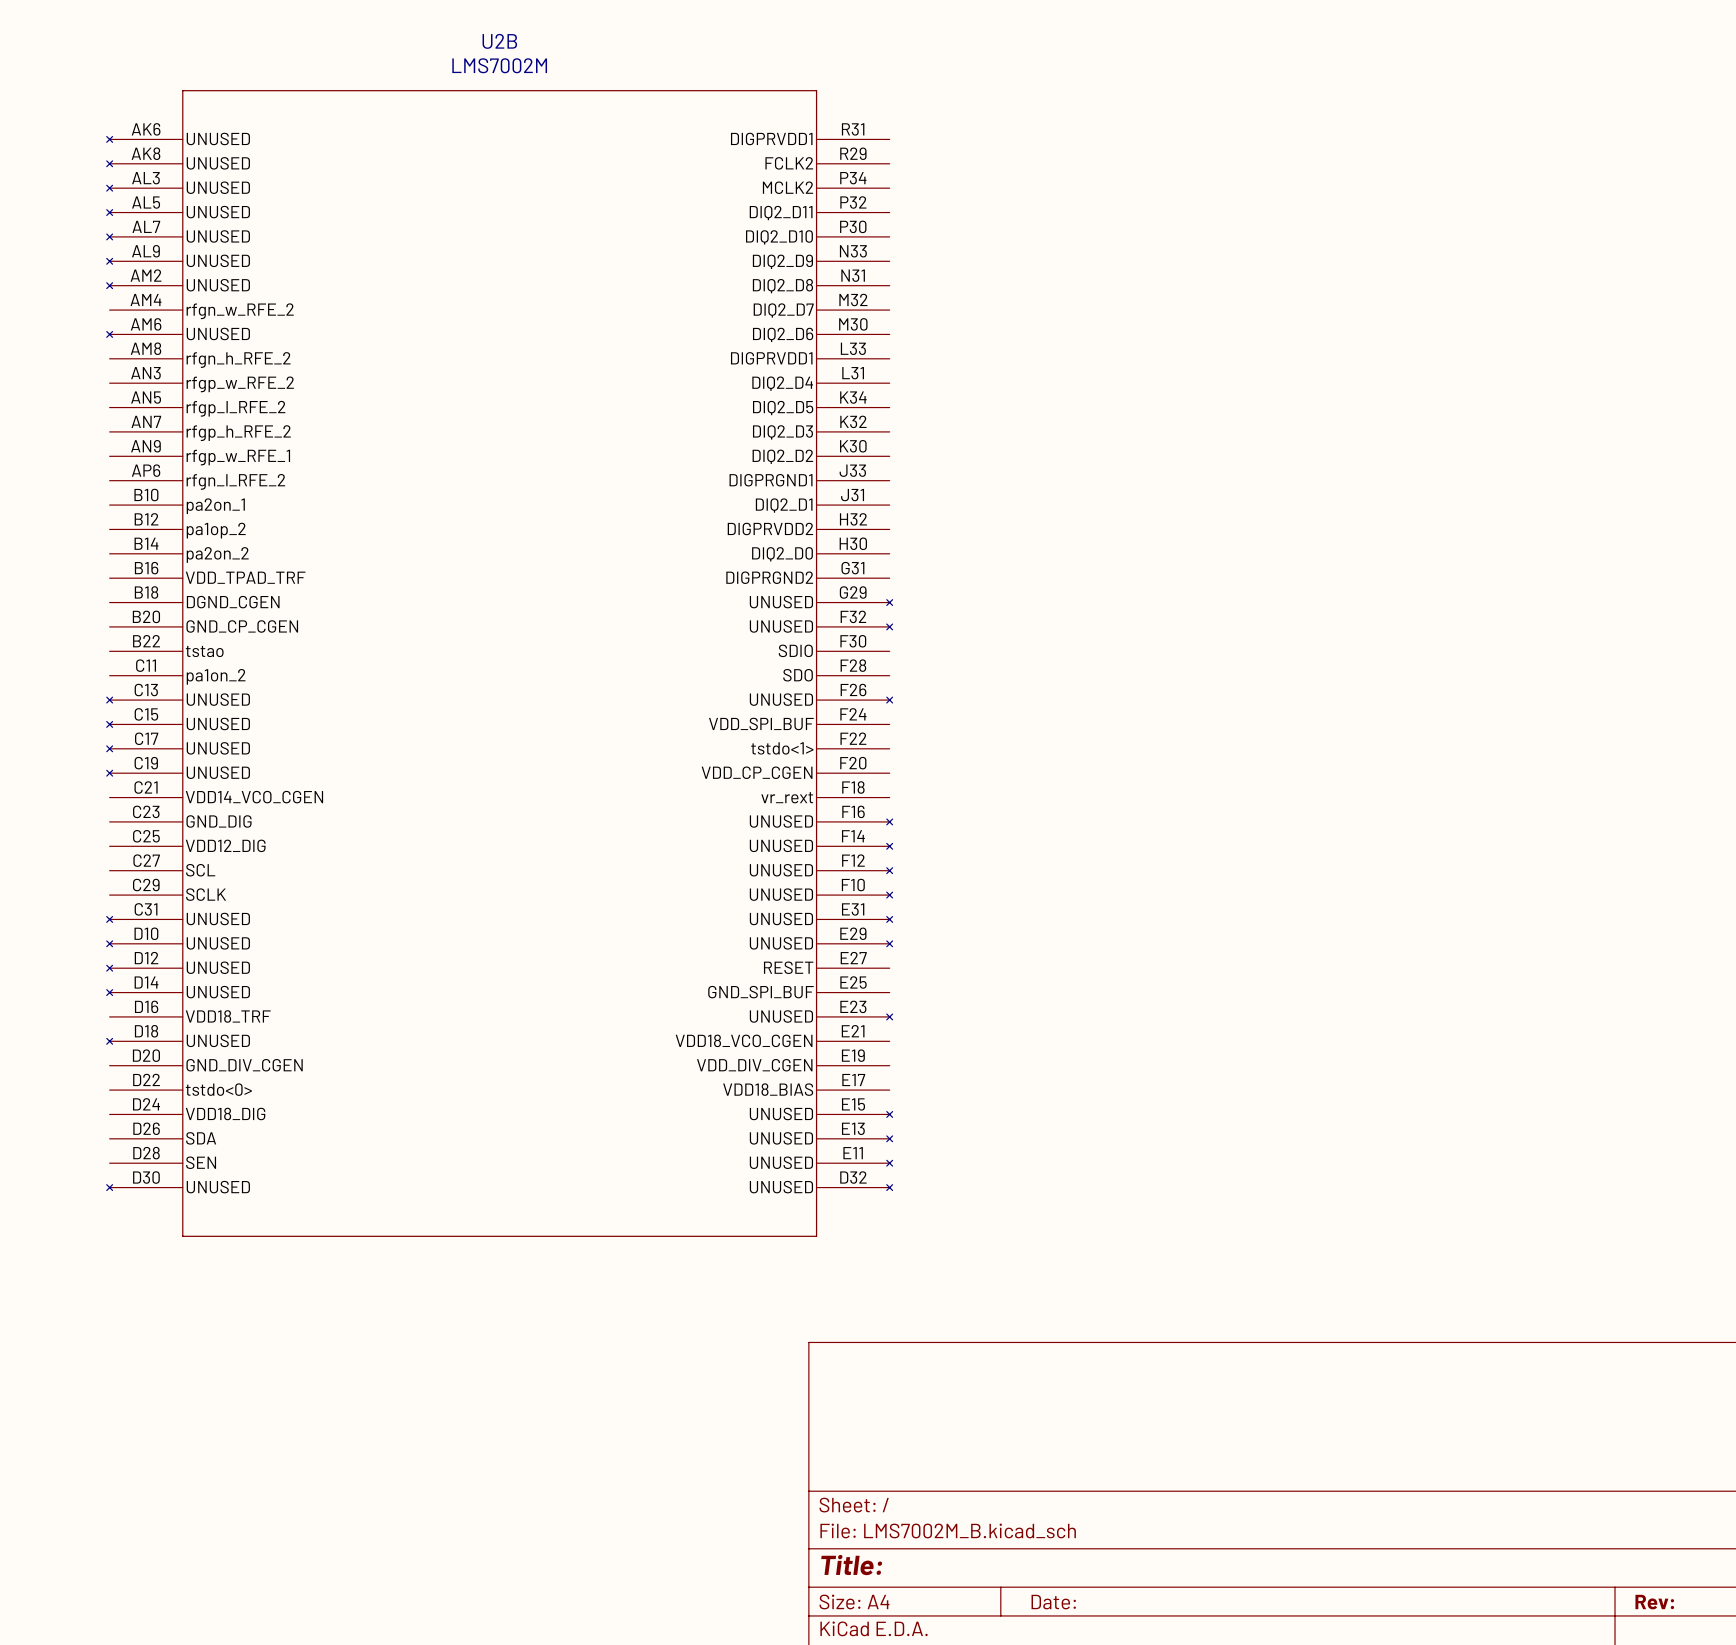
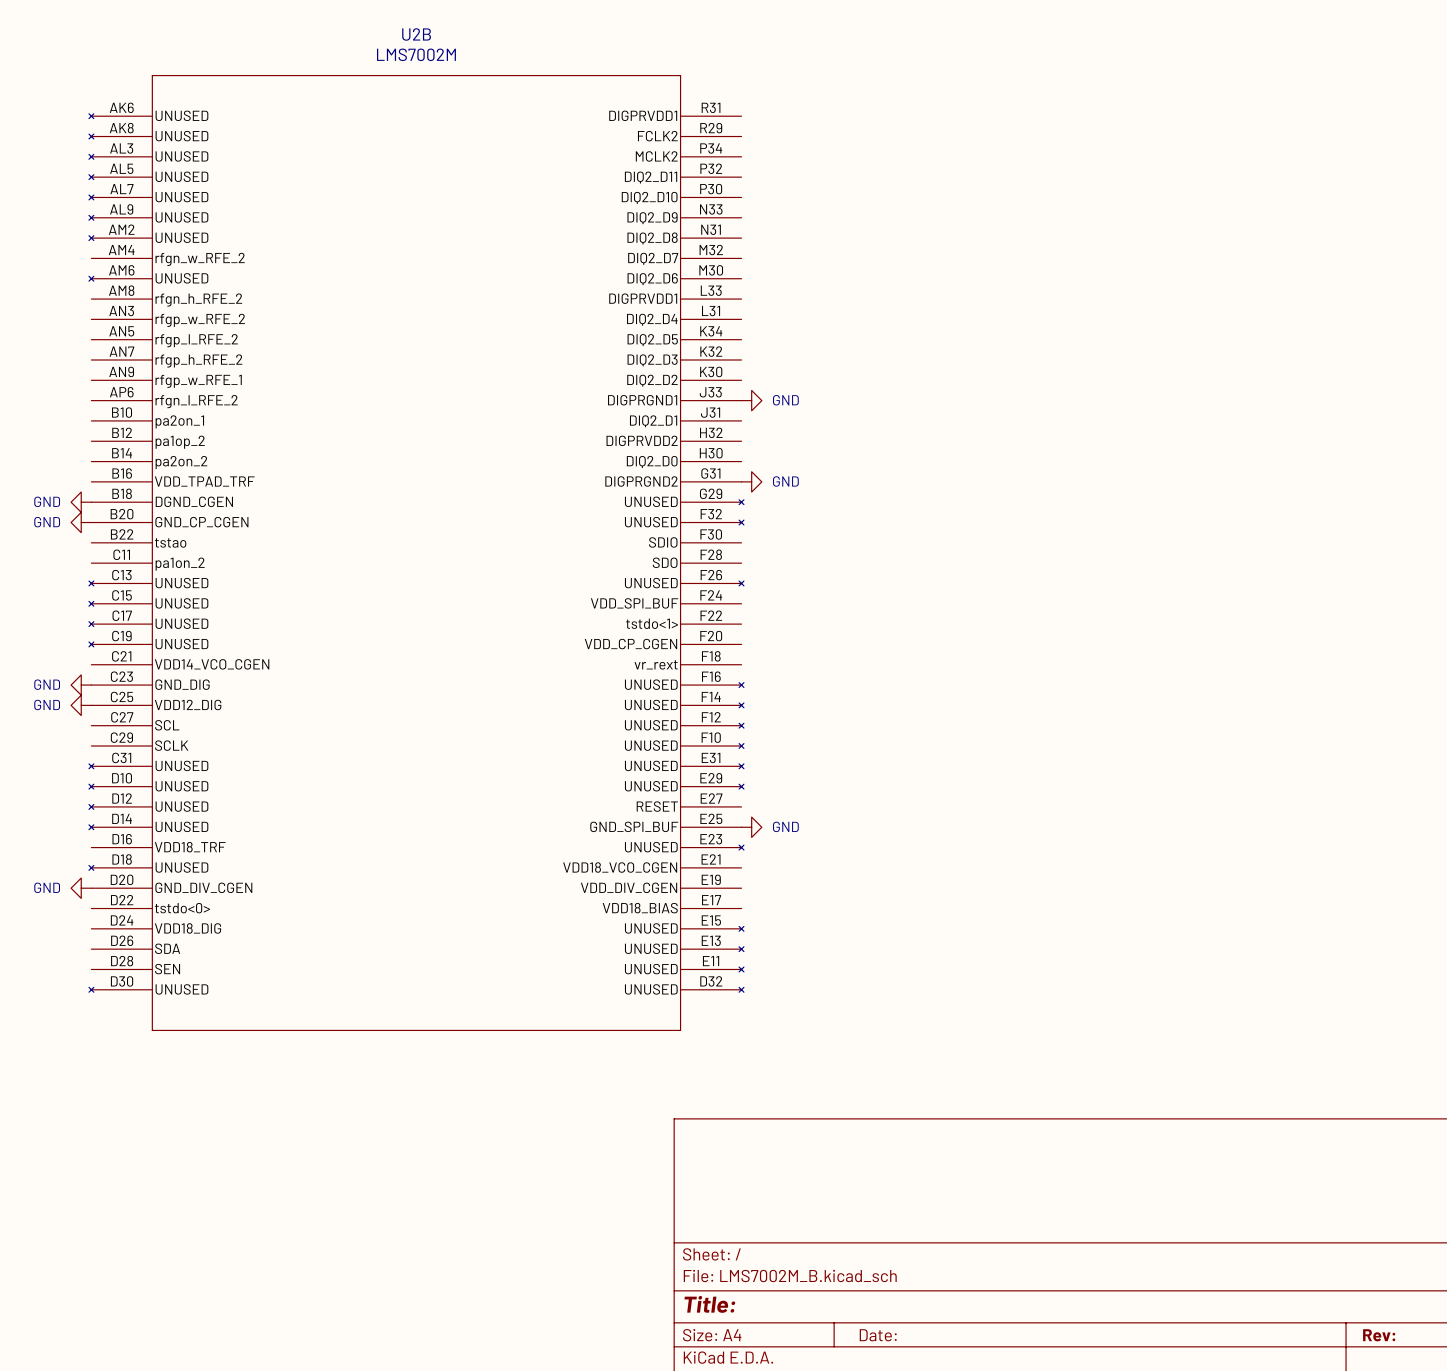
power symbol: none -> GND (751, 400)
power symbol: none -> GND (751, 481)
power symbol: none -> GND (81, 502)
power symbol: none -> GND (81, 522)
power symbol: none -> GND (81, 685)
power symbol: none -> GND (81, 705)
power symbol: none -> GND (751, 827)
power symbol: none -> GND (81, 888)

